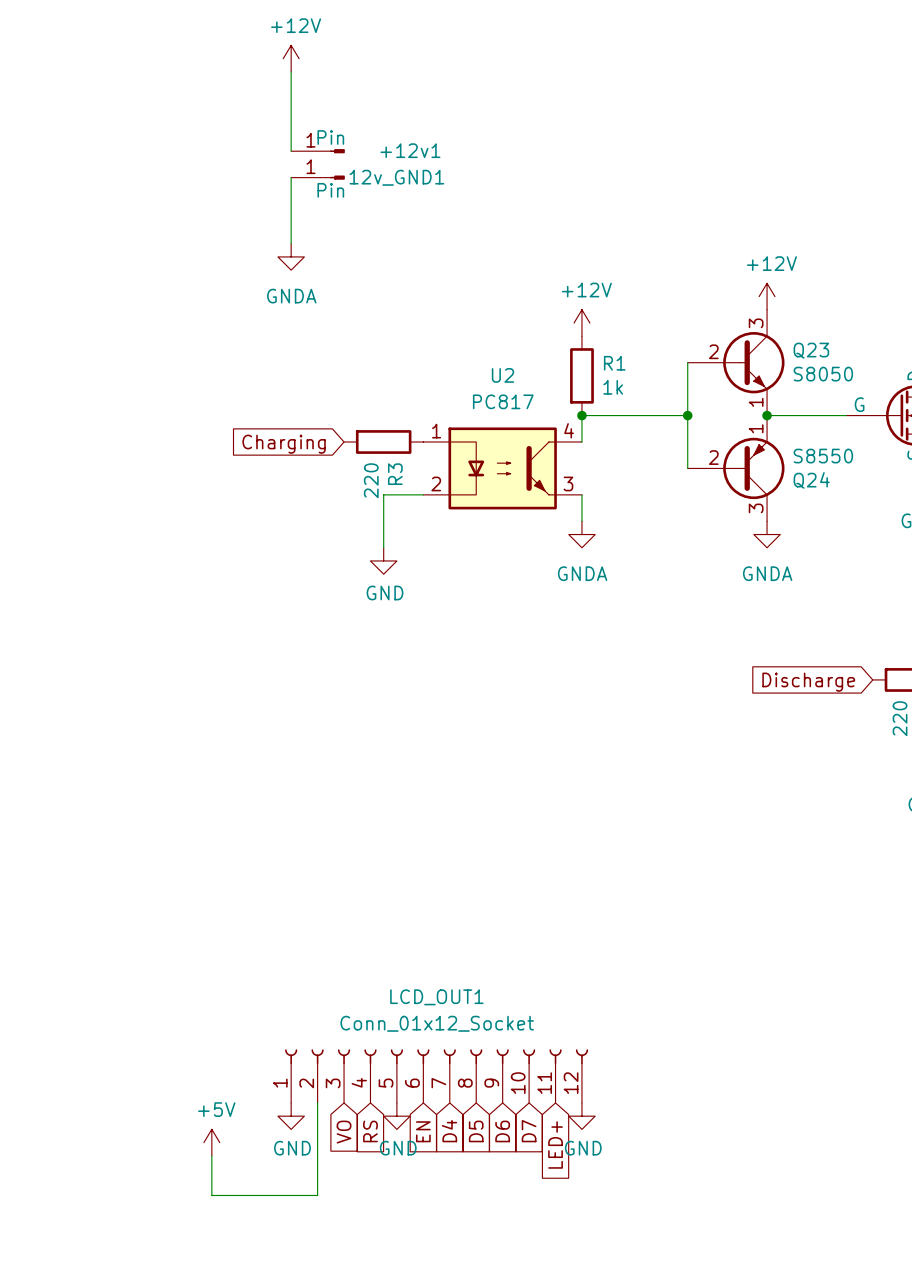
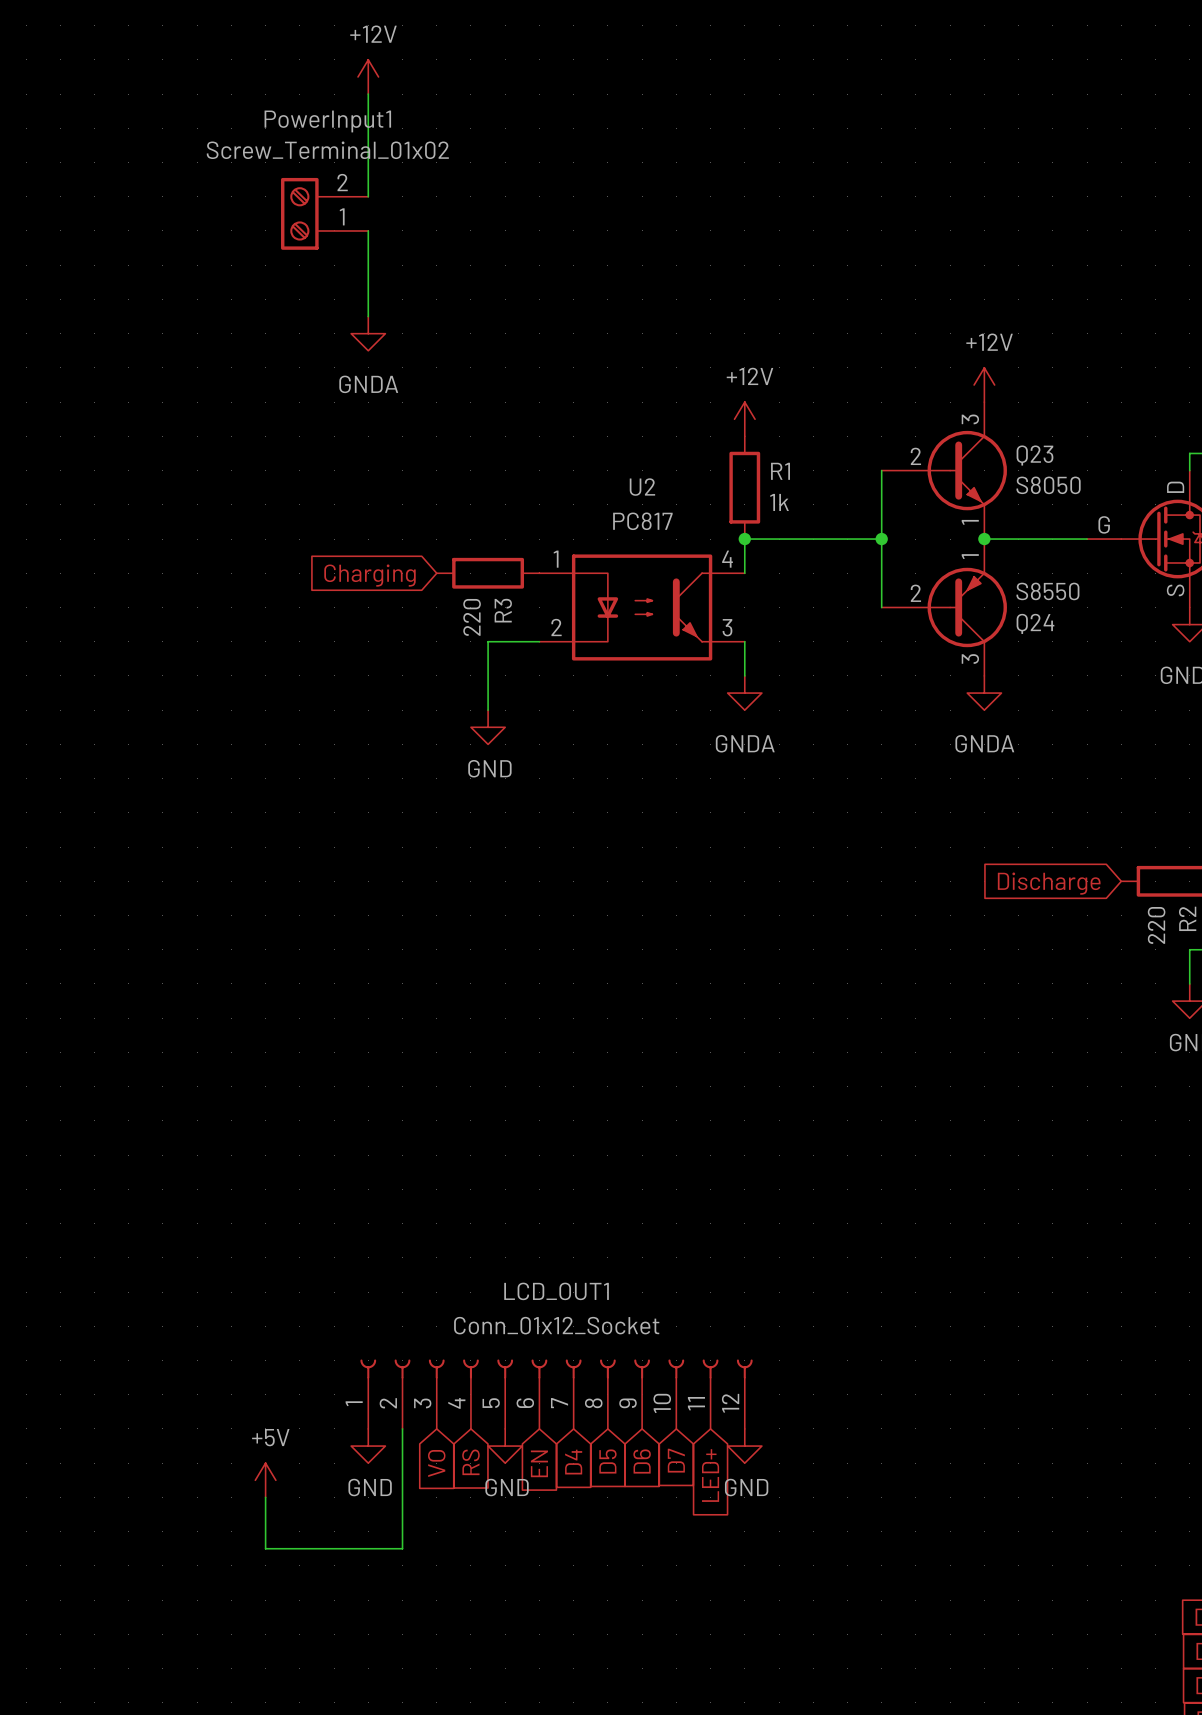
+12v1: Pin (317, 151) -> none
PowerInput1: none -> Screw_Terminal_01x02 (324, 213)
12v_GND1: Pin (317, 177) -> none

